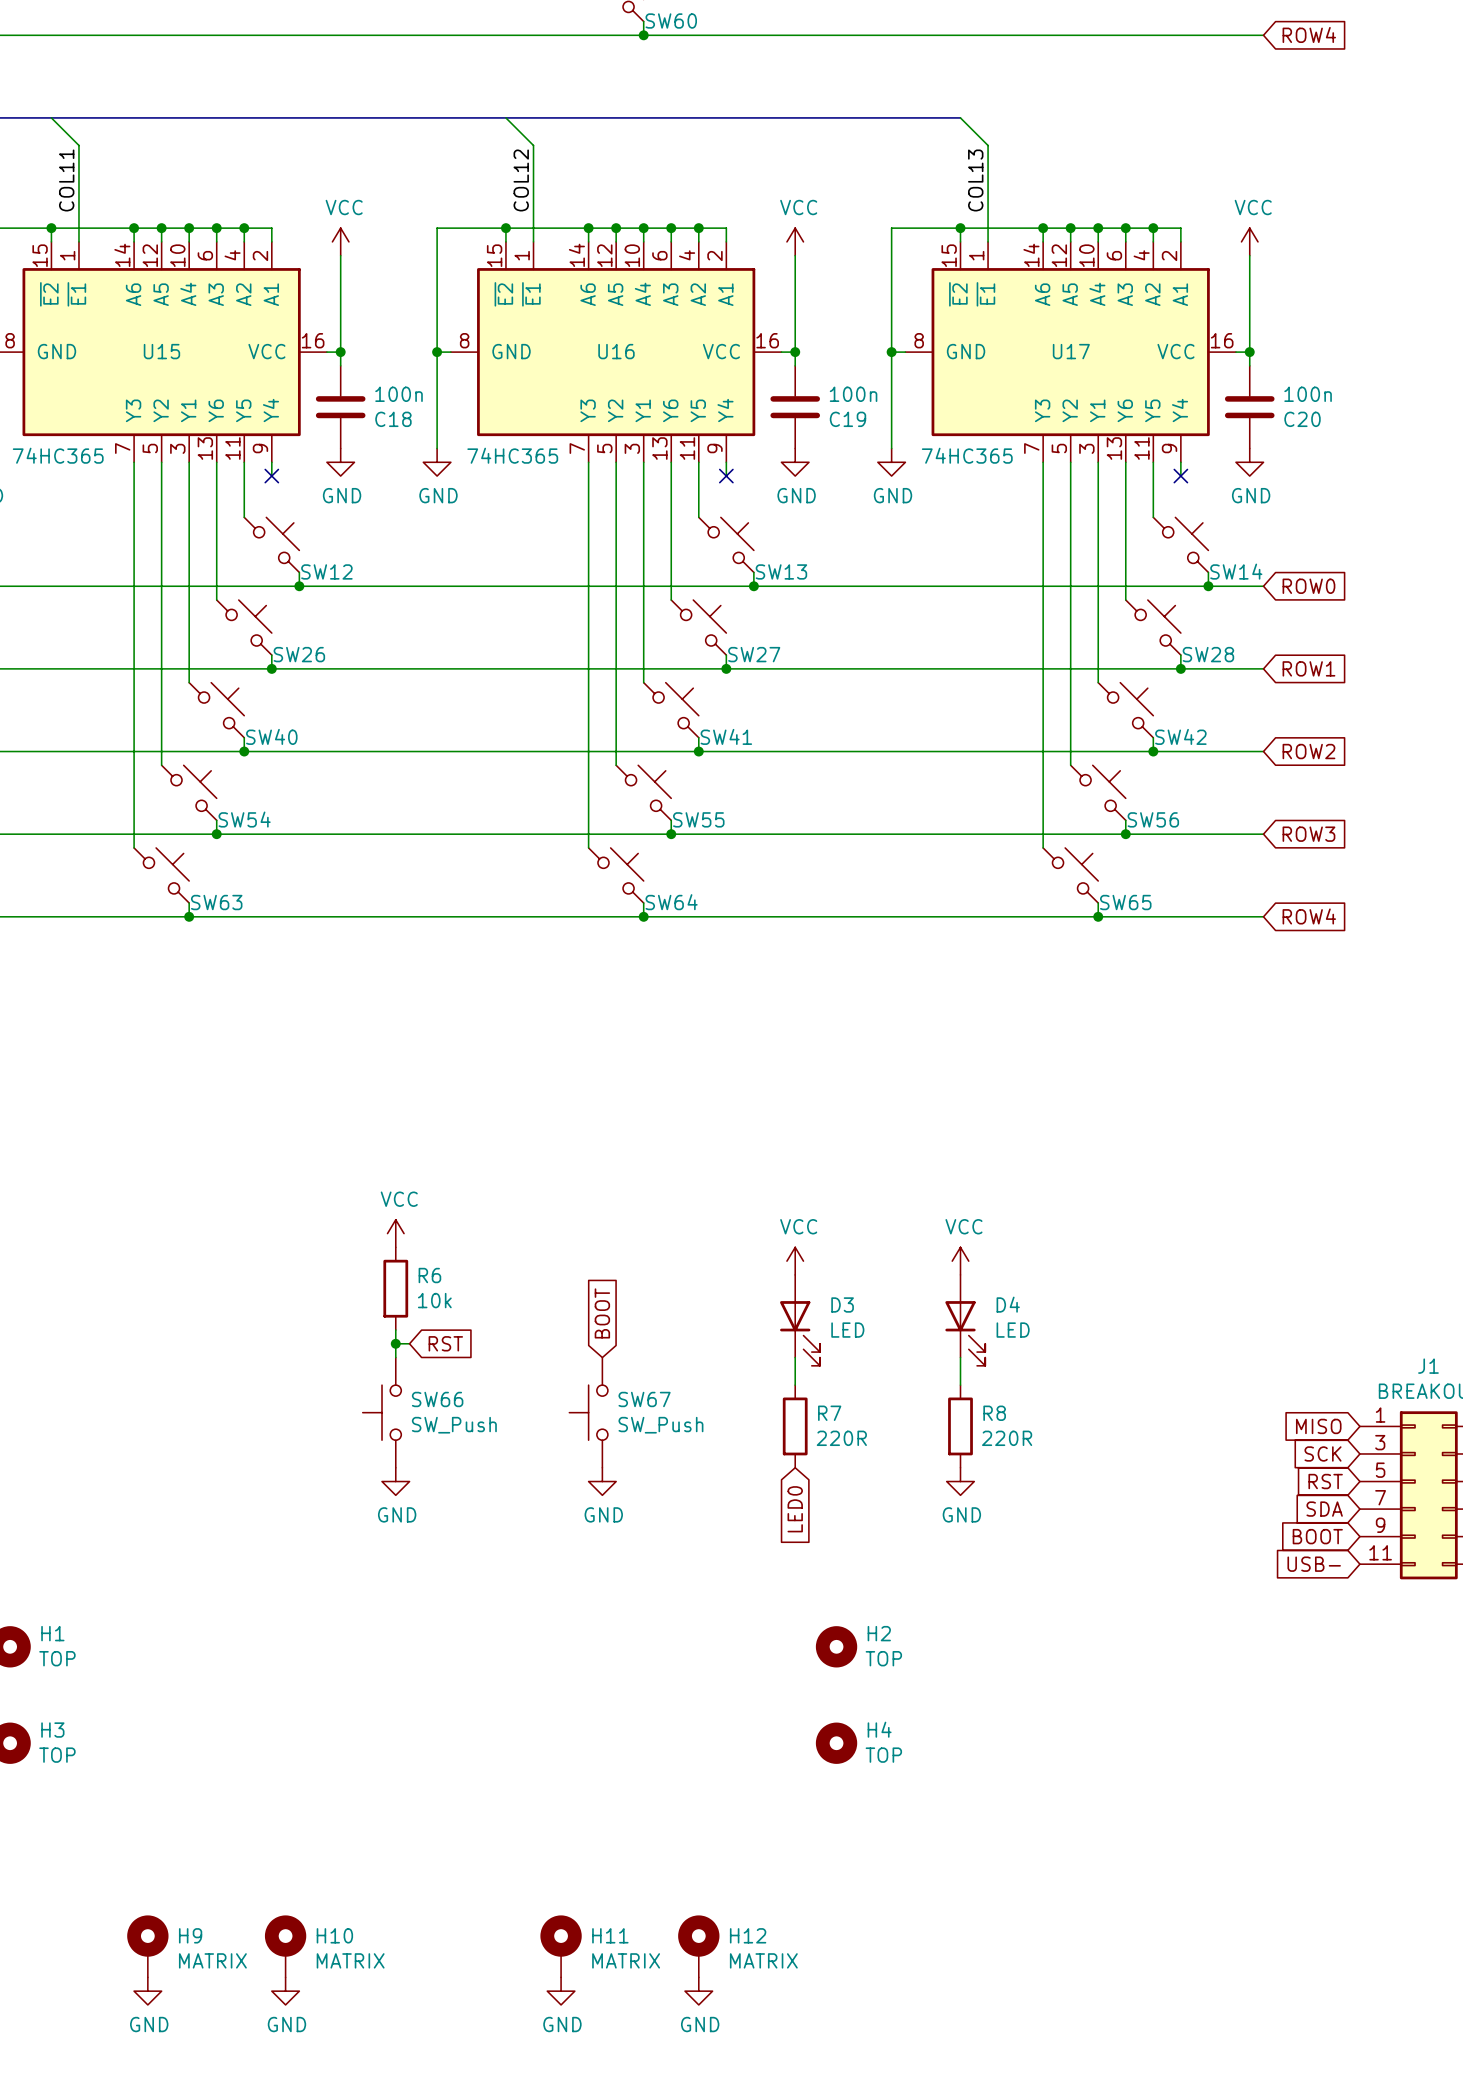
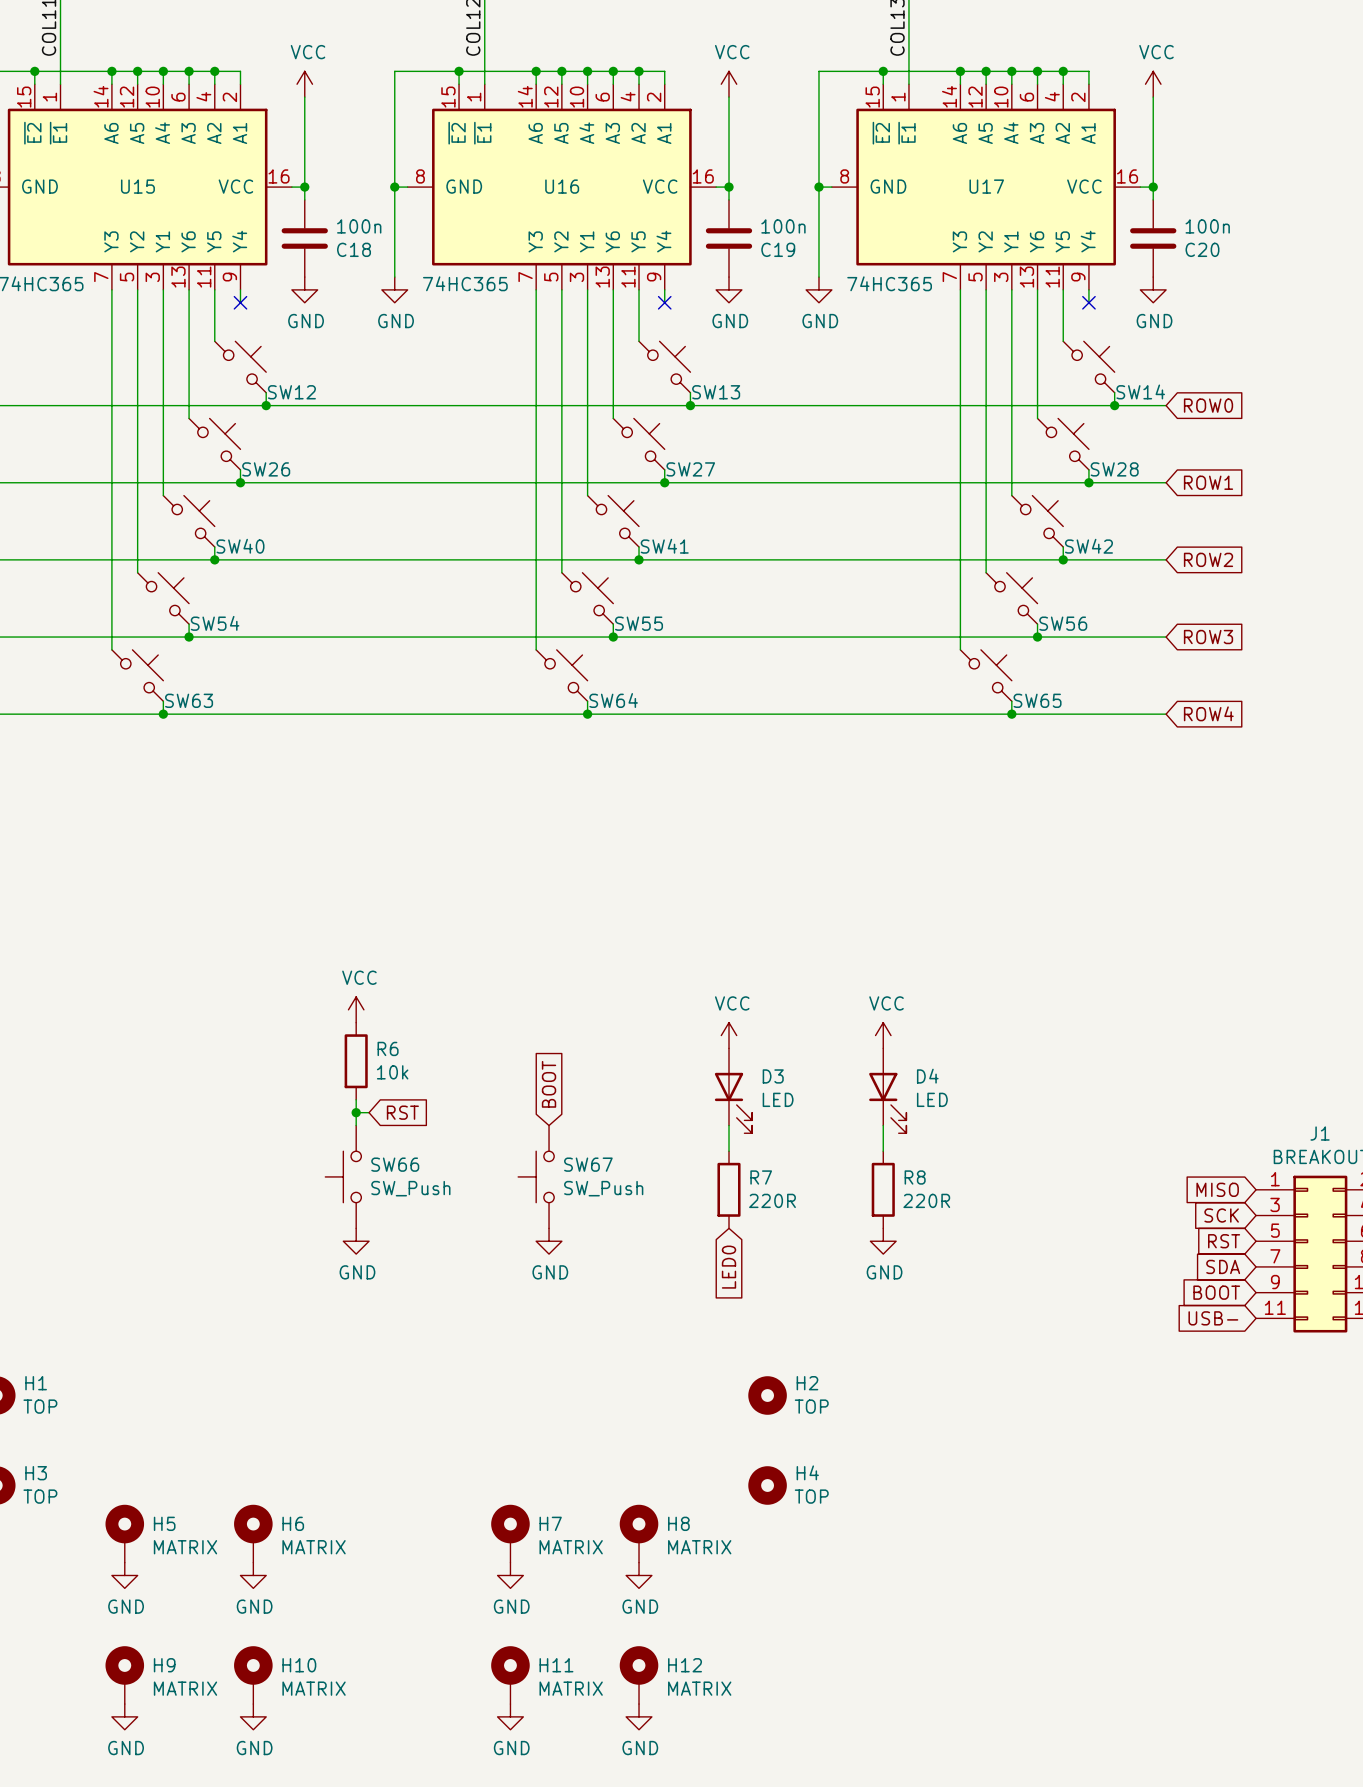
H5: none -> MATRIX (124, 1533)
H6: none -> MATRIX (253, 1533)
H7: none -> MATRIX (510, 1533)
H8: none -> MATRIX (639, 1533)
power symbol: none -> GND (124, 1575)
power symbol: none -> GND (253, 1575)
power symbol: none -> GND (510, 1575)
power symbol: none -> GND (639, 1575)

